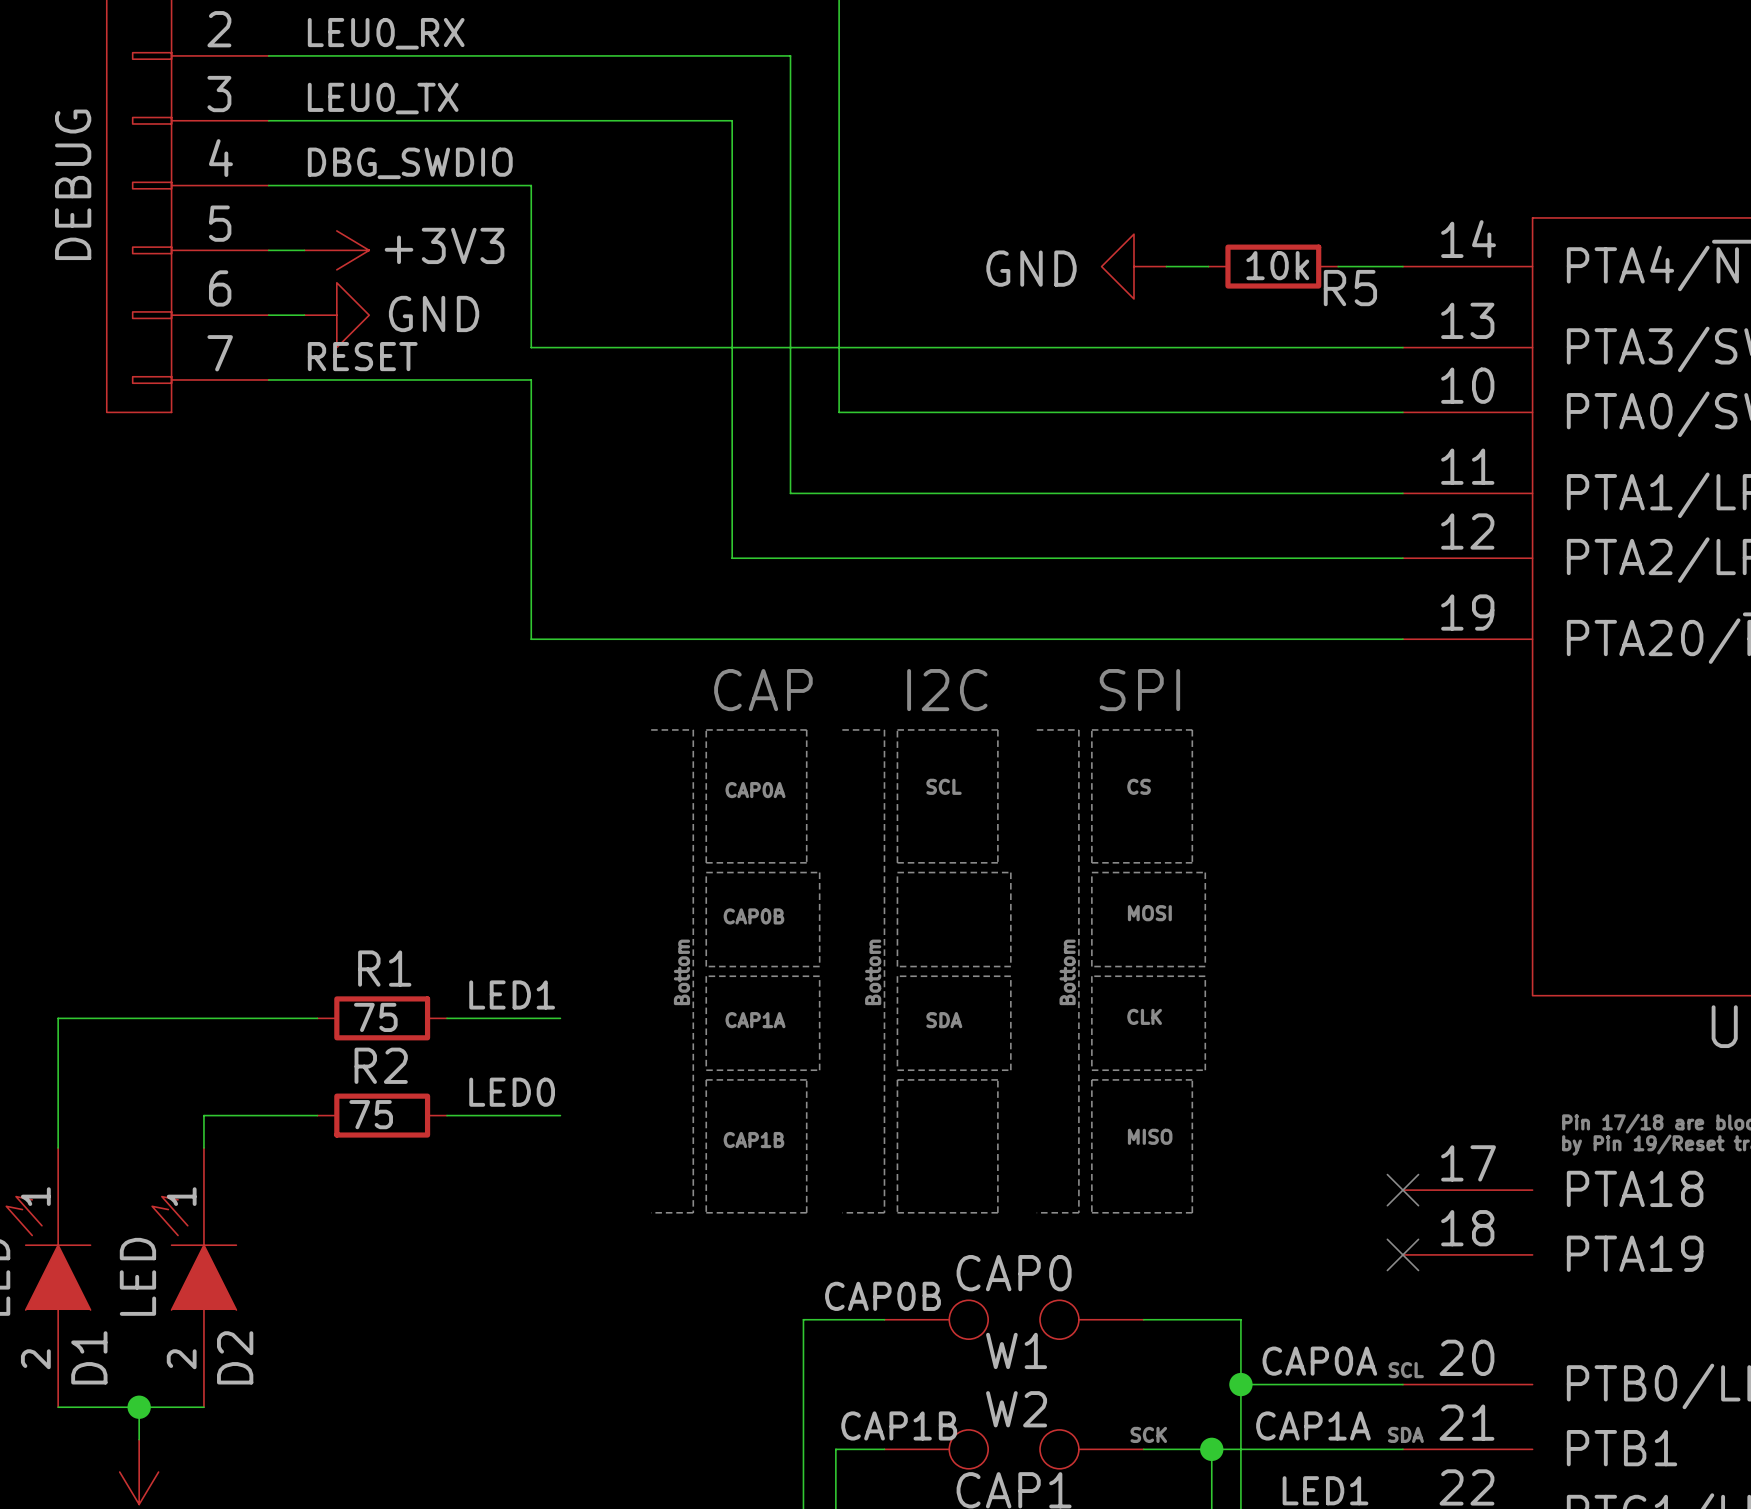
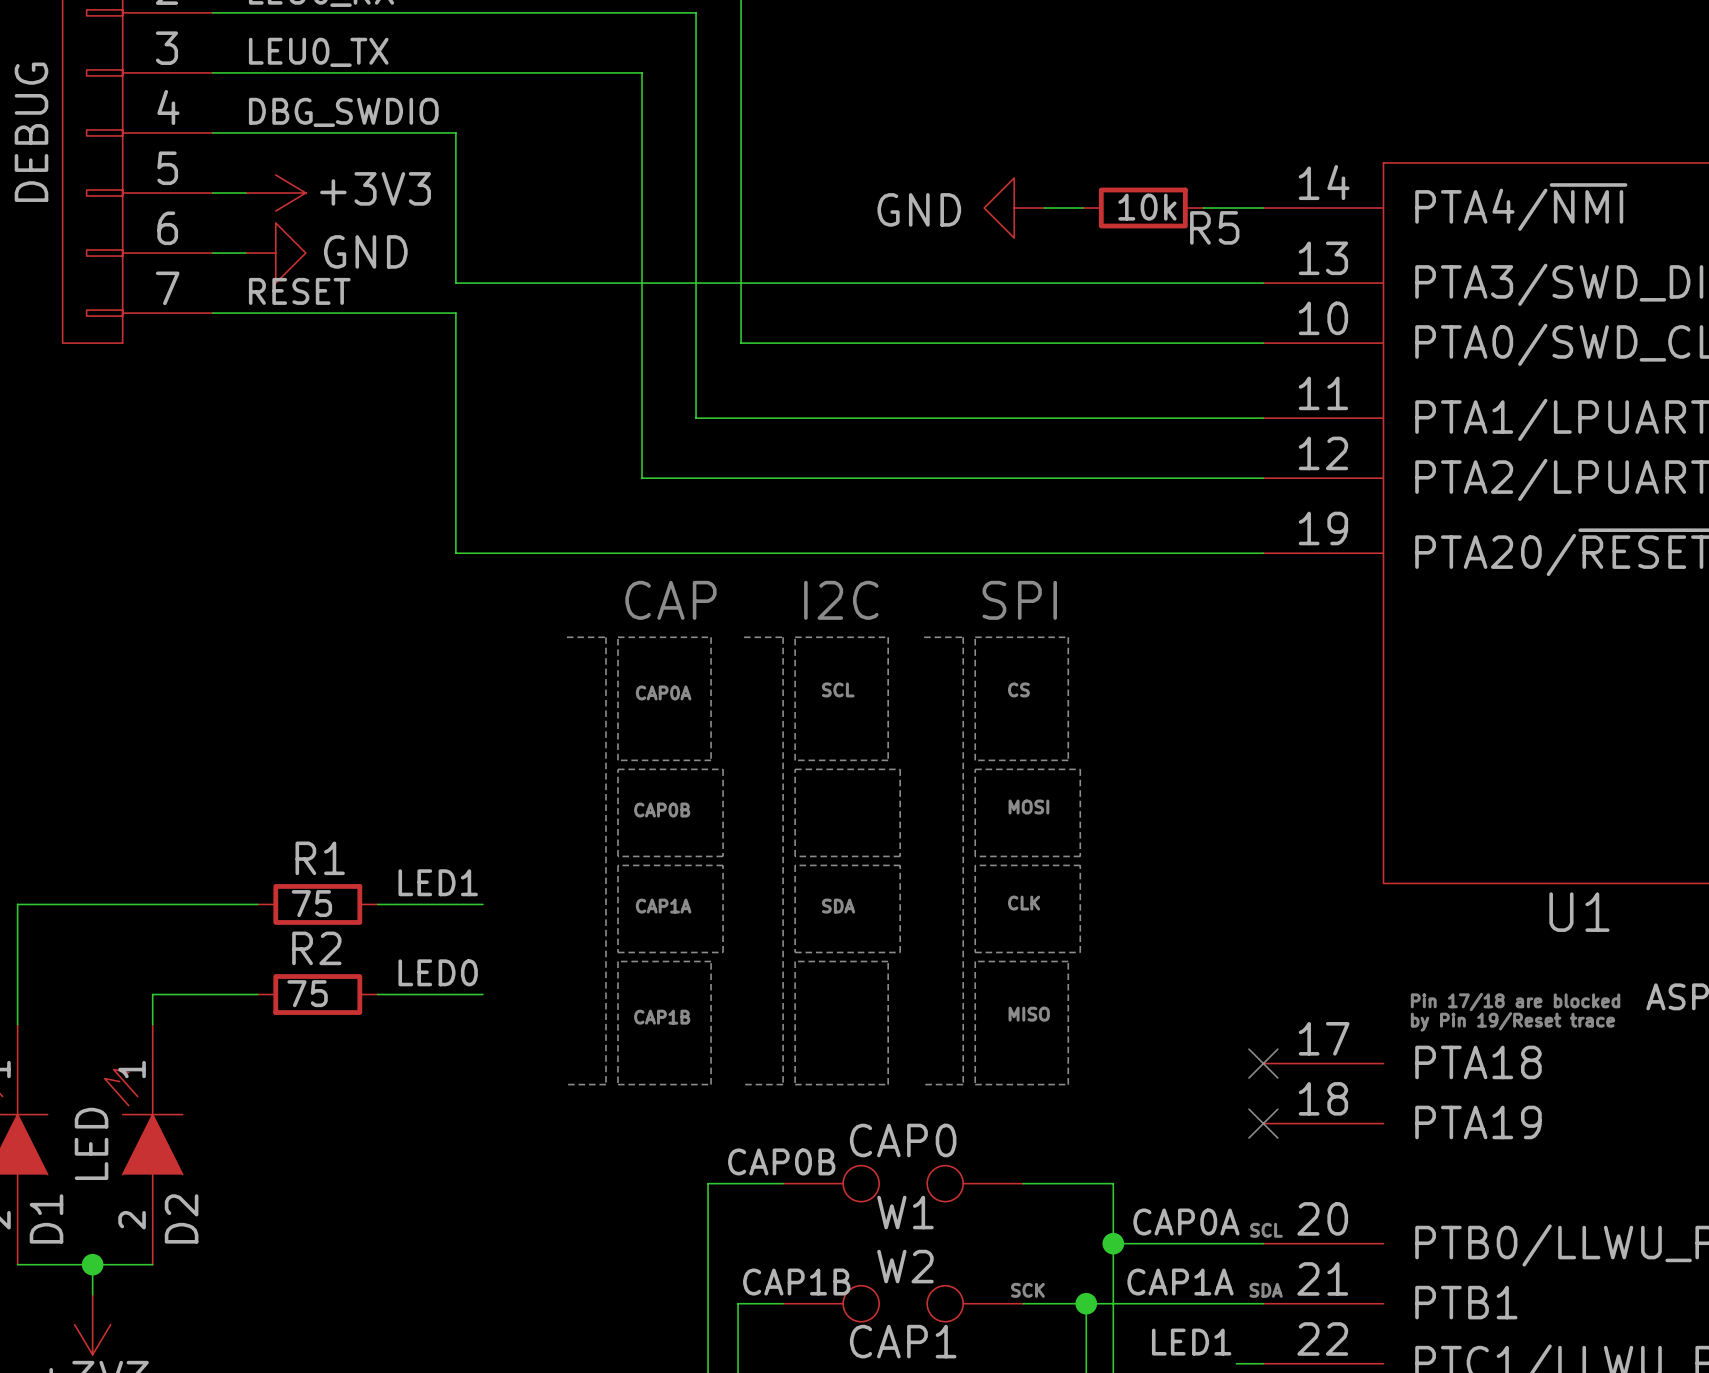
text: Bottom (681, 972) -> none
text: Bottom (873, 972) -> none
text: Bottom (1067, 972) -> none

